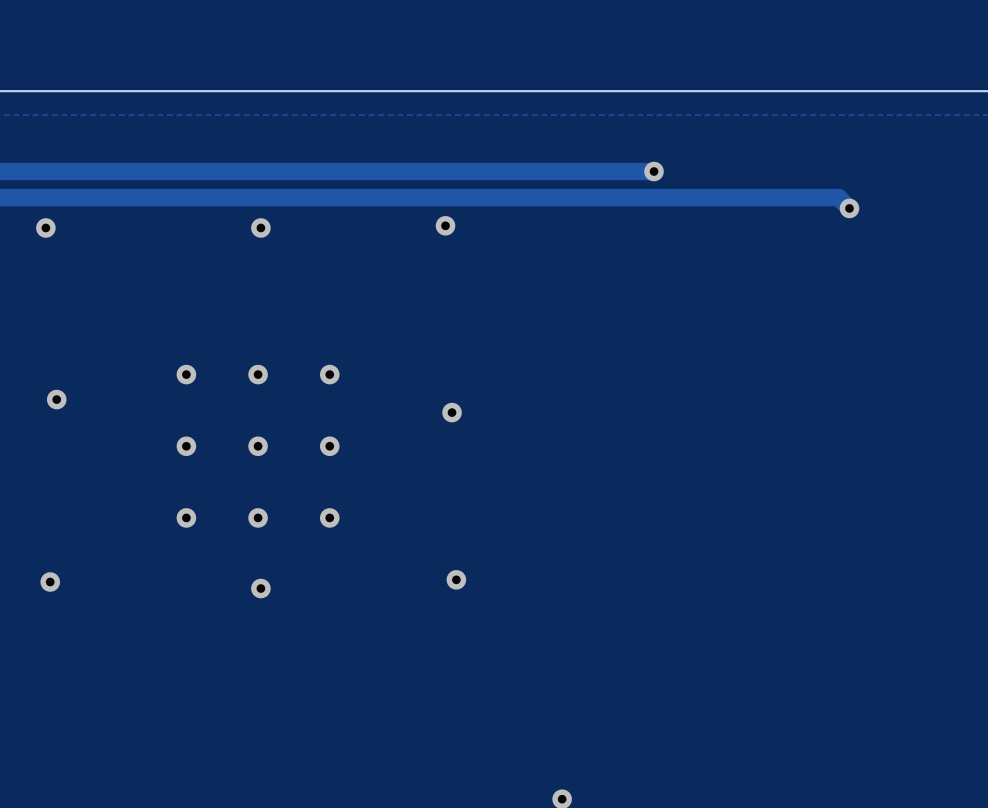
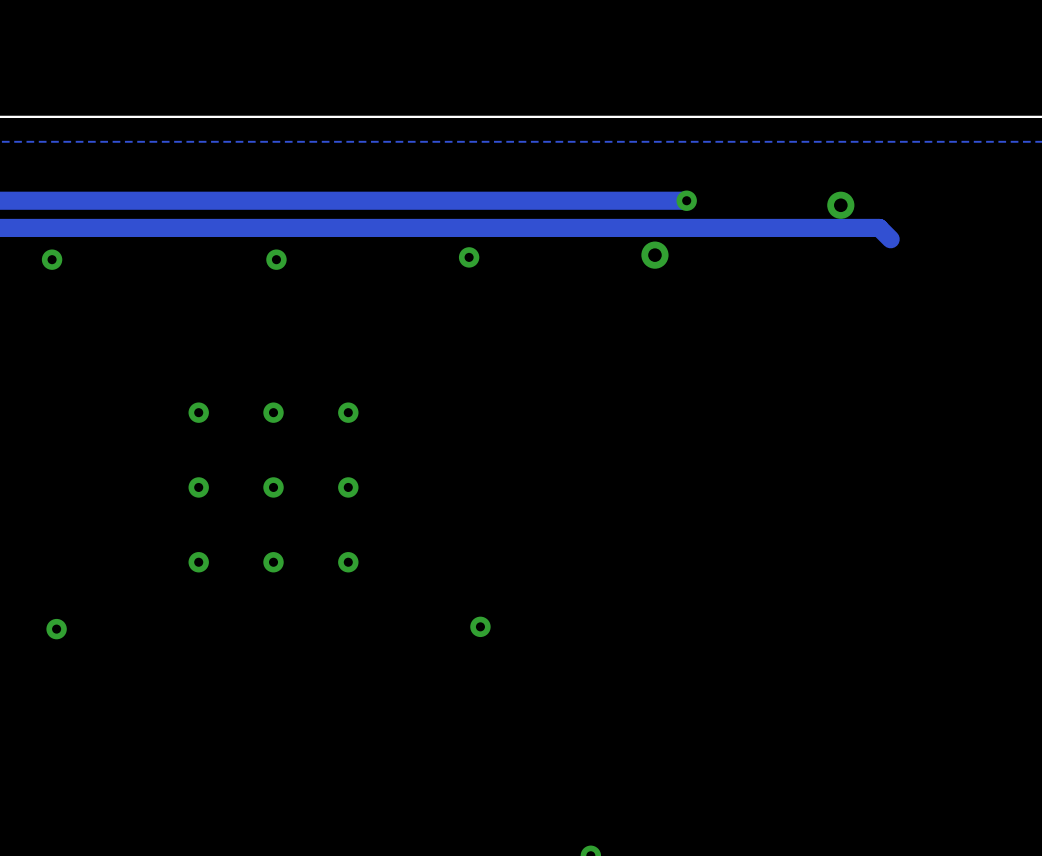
via: none -> (840, 205)
via: (849, 208) -> none
via: none -> (654, 255)
via: (56, 399) -> none
via: (452, 412) -> none
via: (260, 588) -> none

